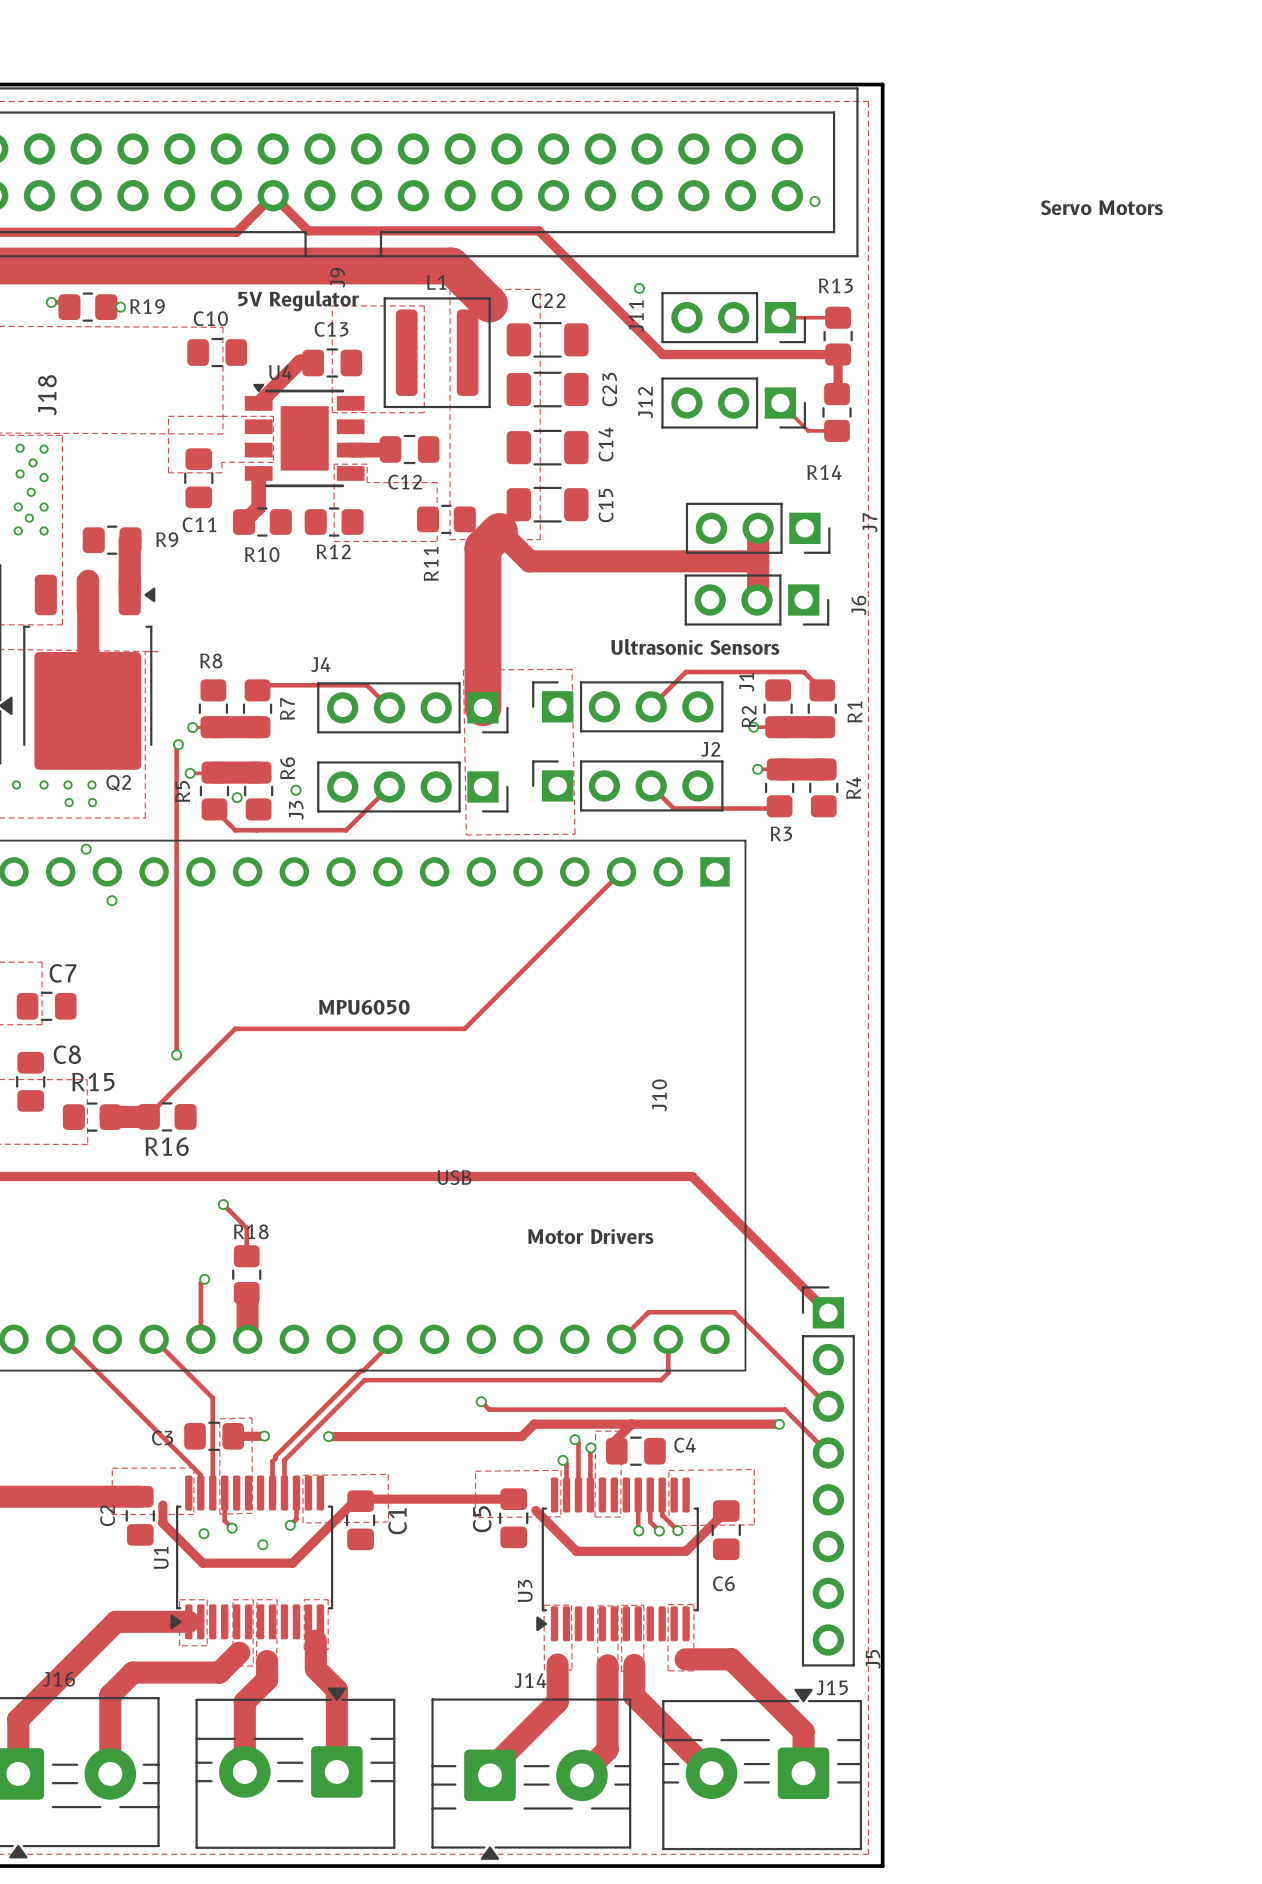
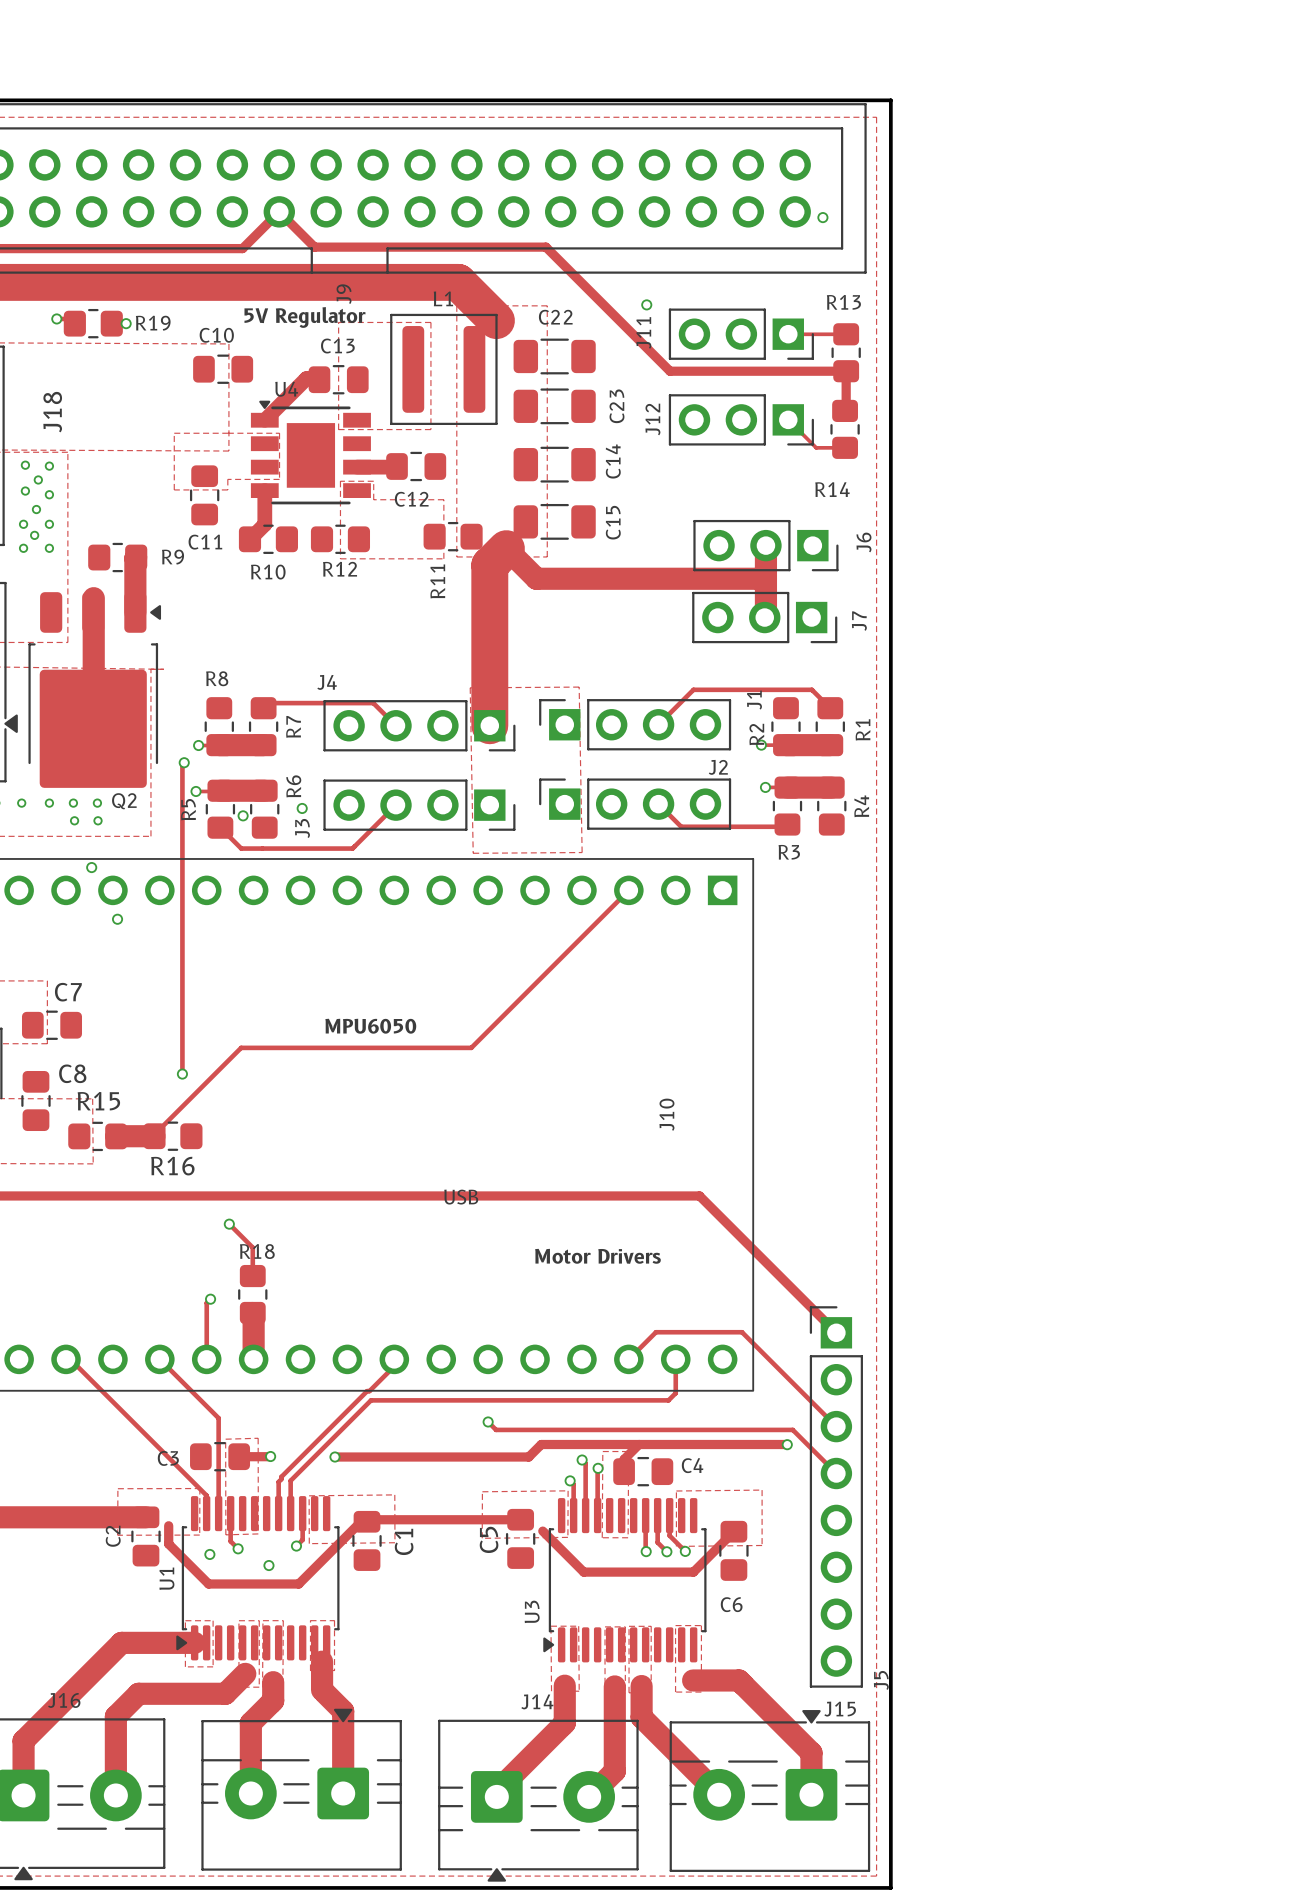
text: Servo Motors (1101, 207) -> none
J7 name position: J7 (869, 522) -> J7 (859, 621)
J6 name position: J6 (858, 605) -> J6 (863, 542)
text: Ultrasonic Sensors (695, 646) -> none

